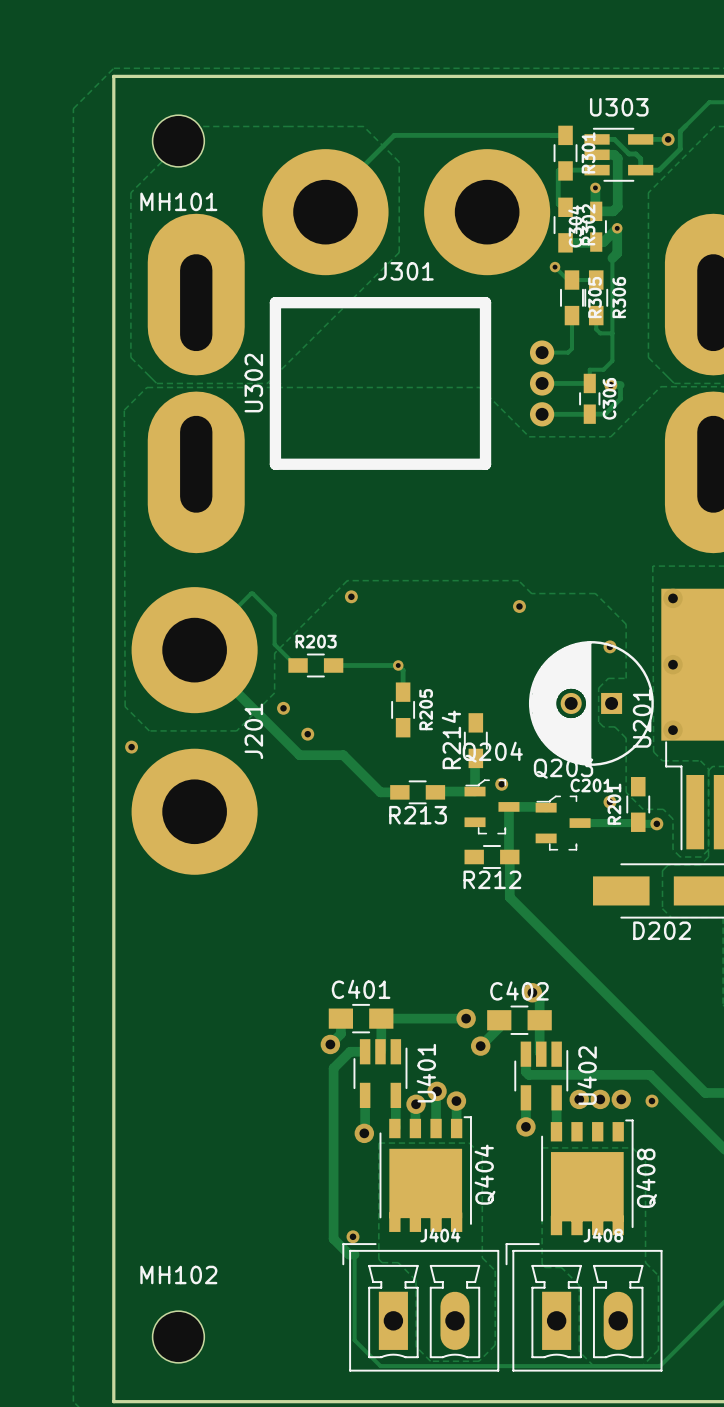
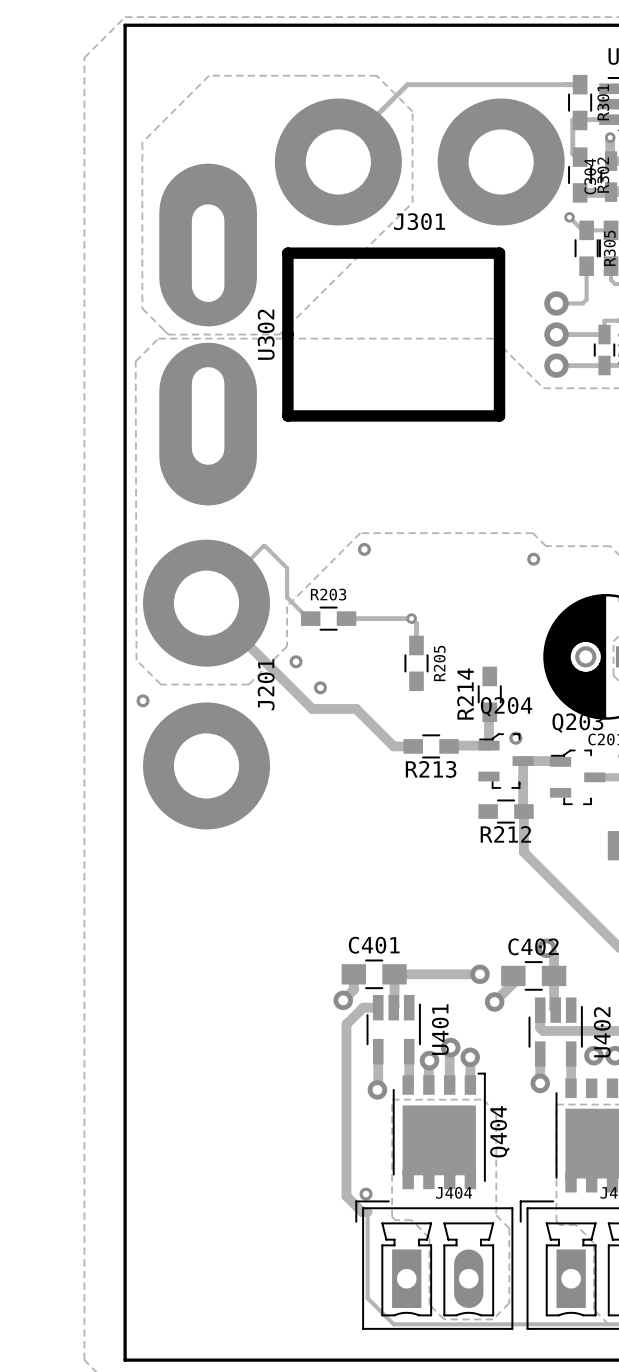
MH101: (178, 141) -> none
MH102: (178, 1337) -> none

